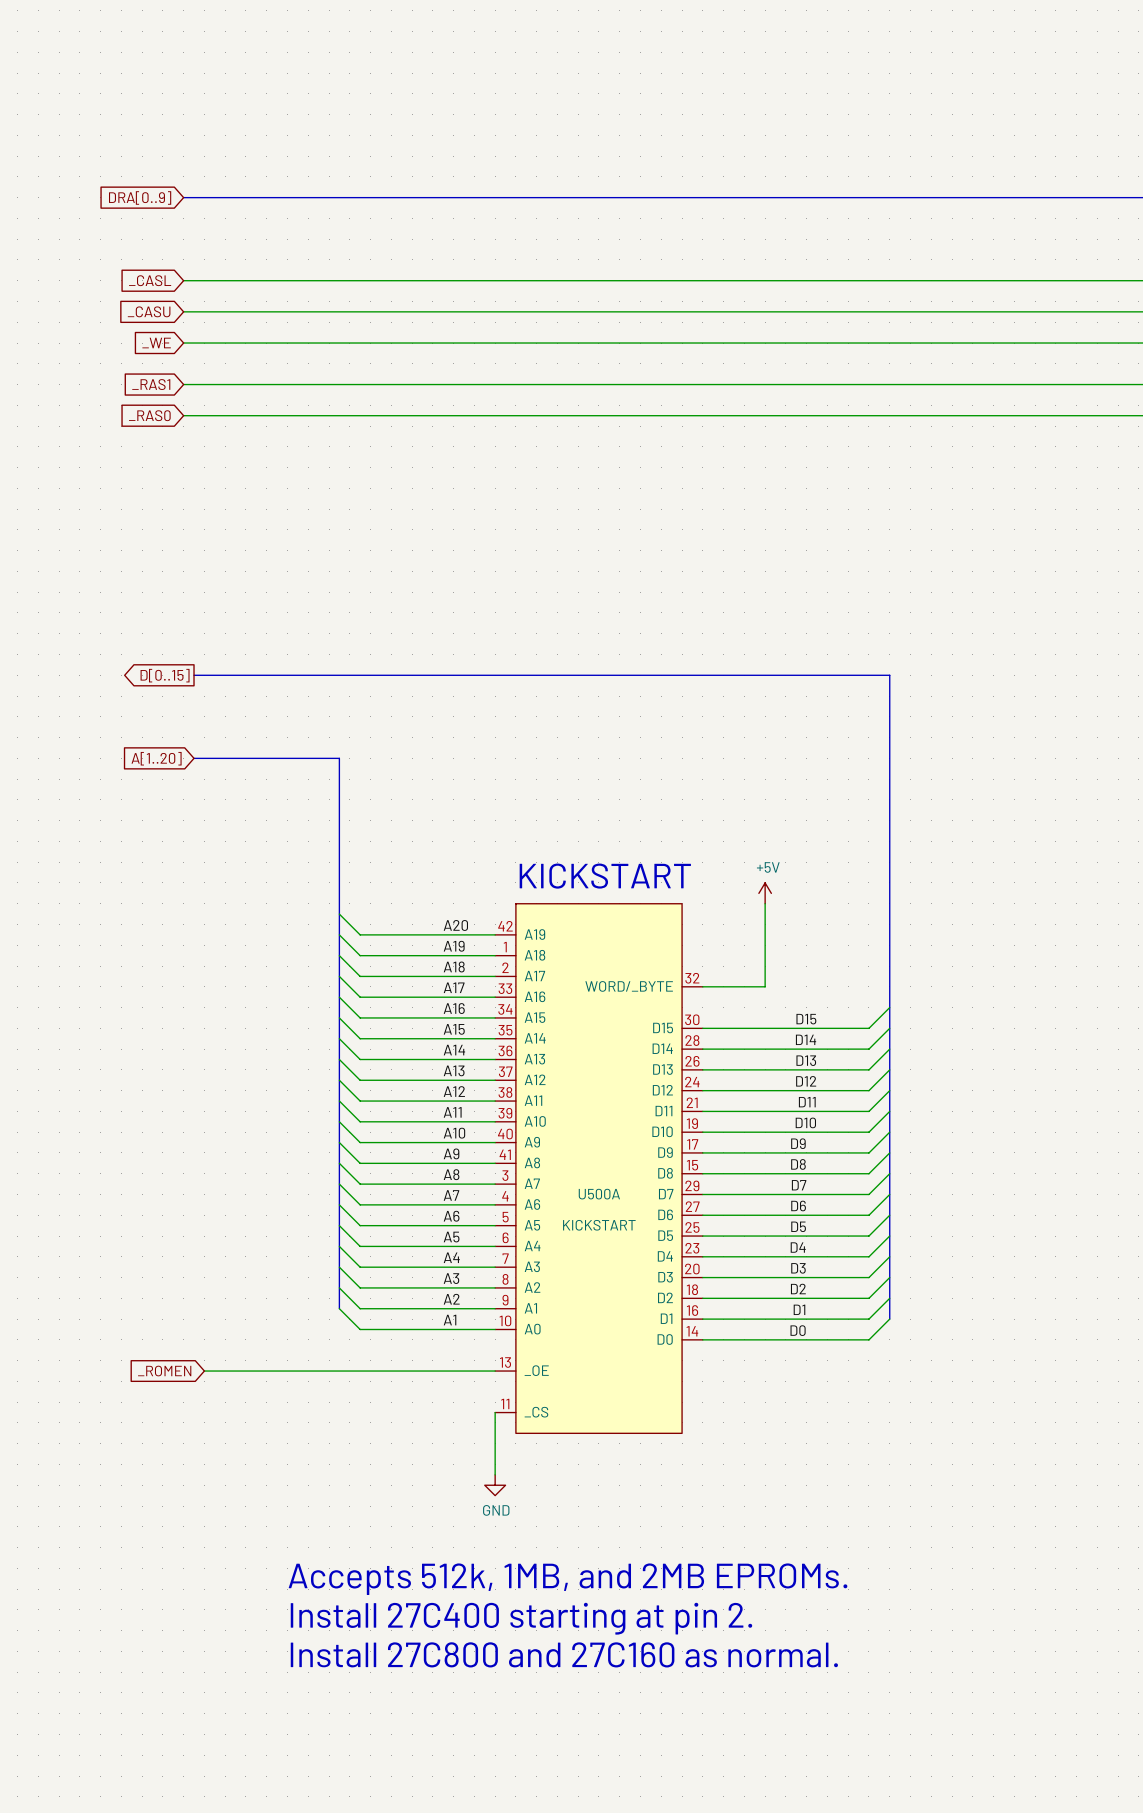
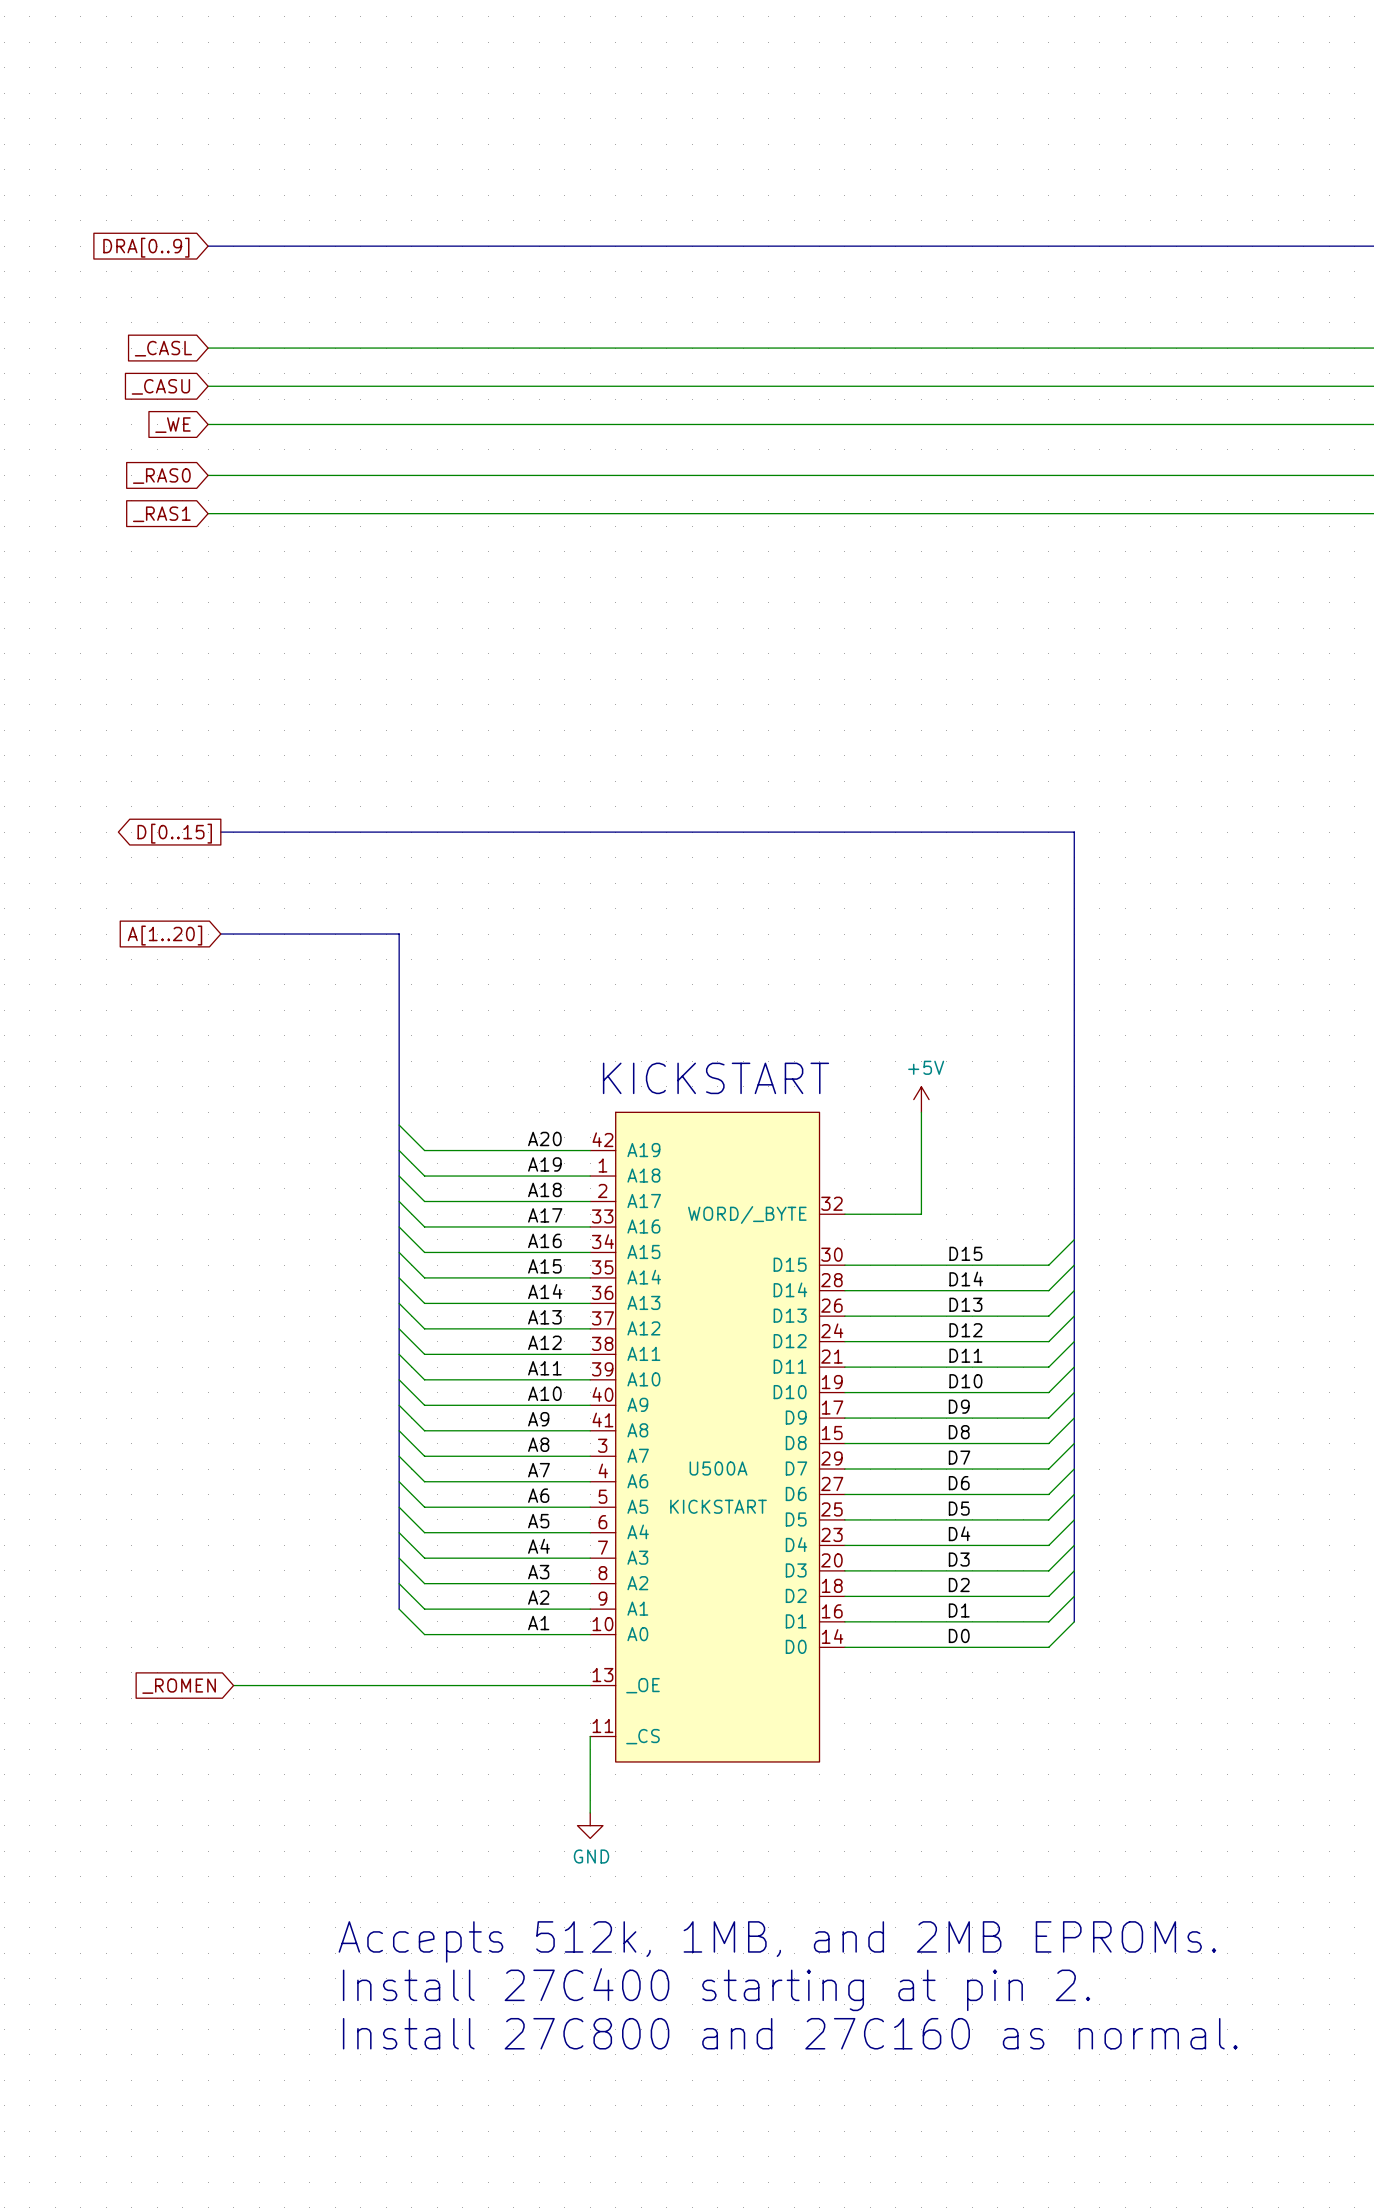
global label: _RAS1 (151, 384) -> _RAS0 (161, 476)
global label: _RAS0 (149, 415) -> _RAS1 (161, 514)

